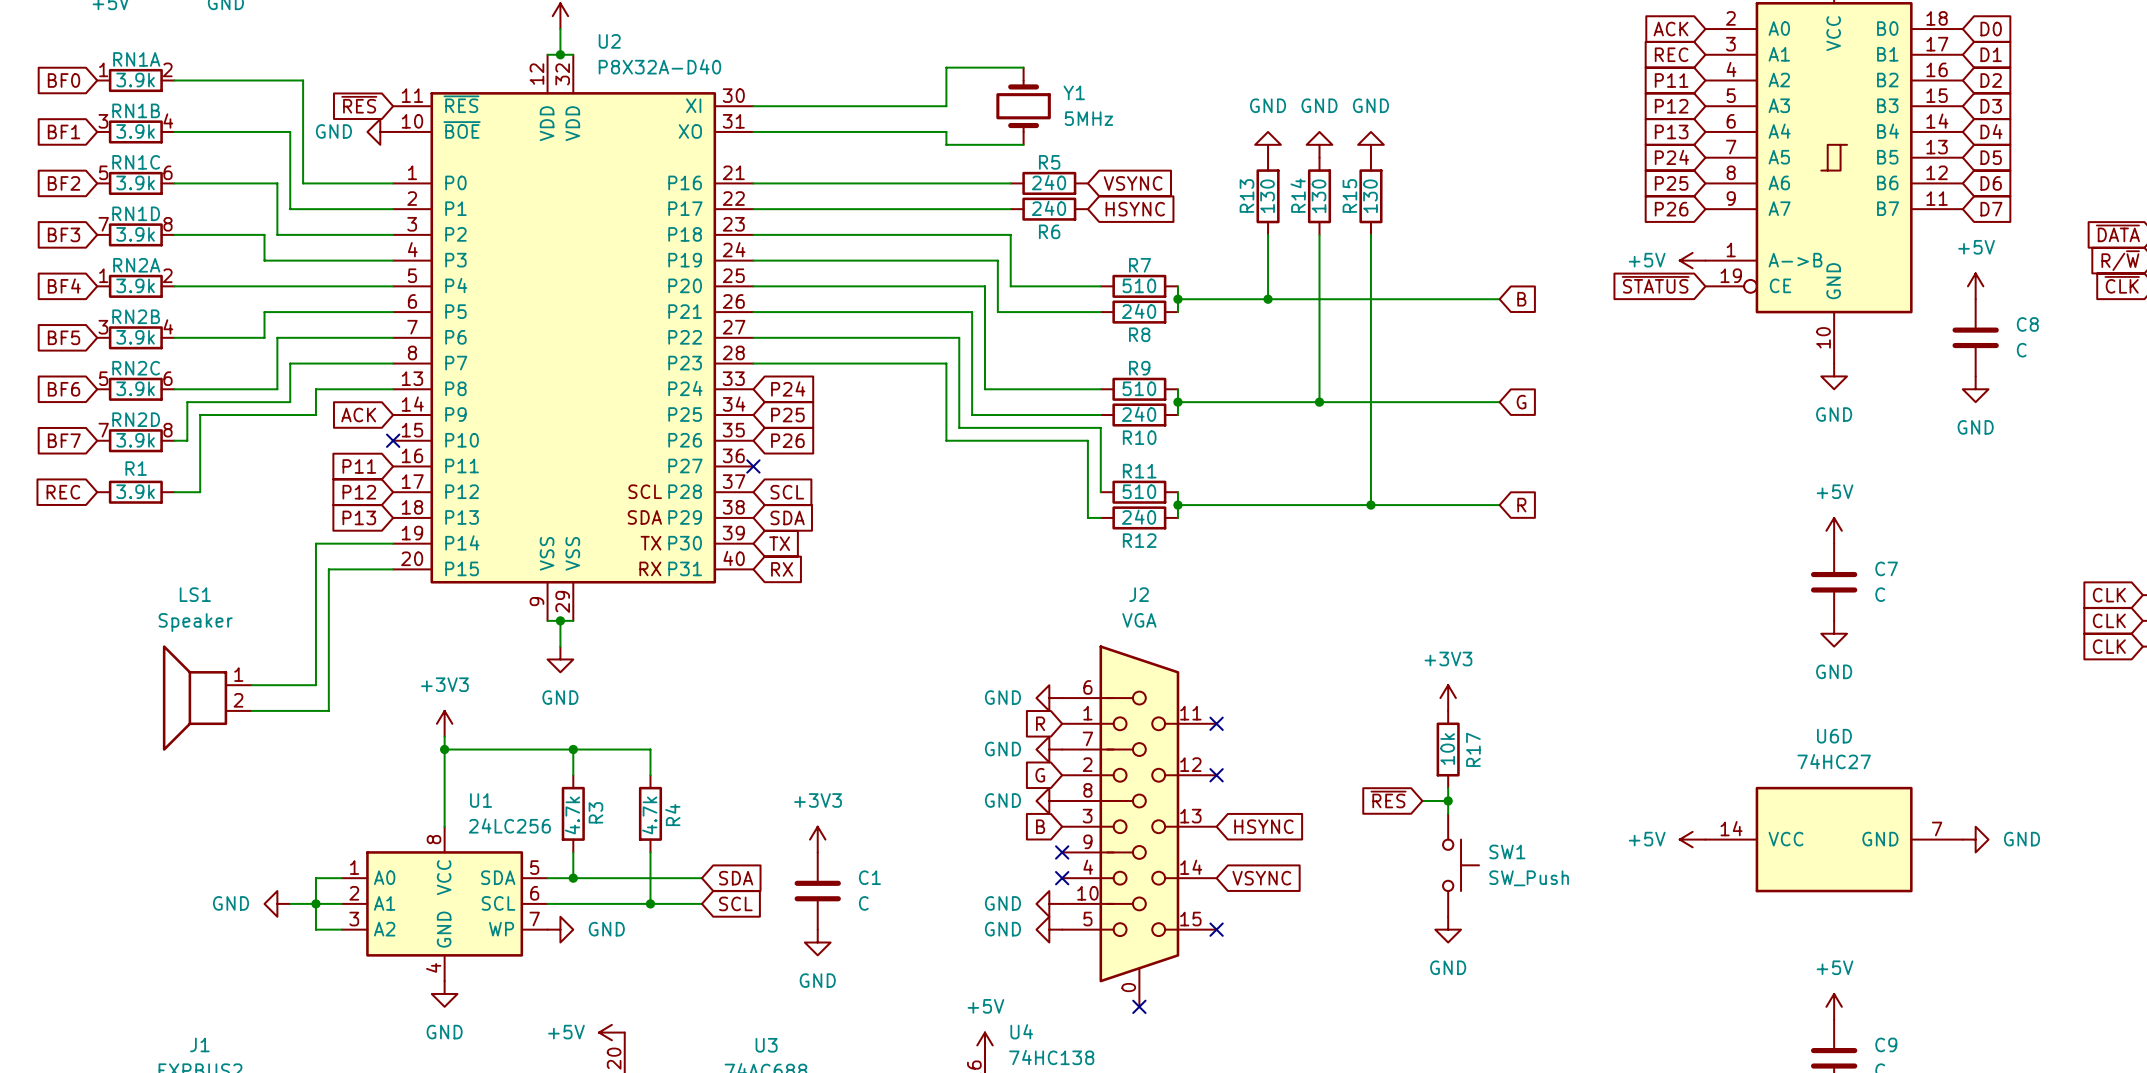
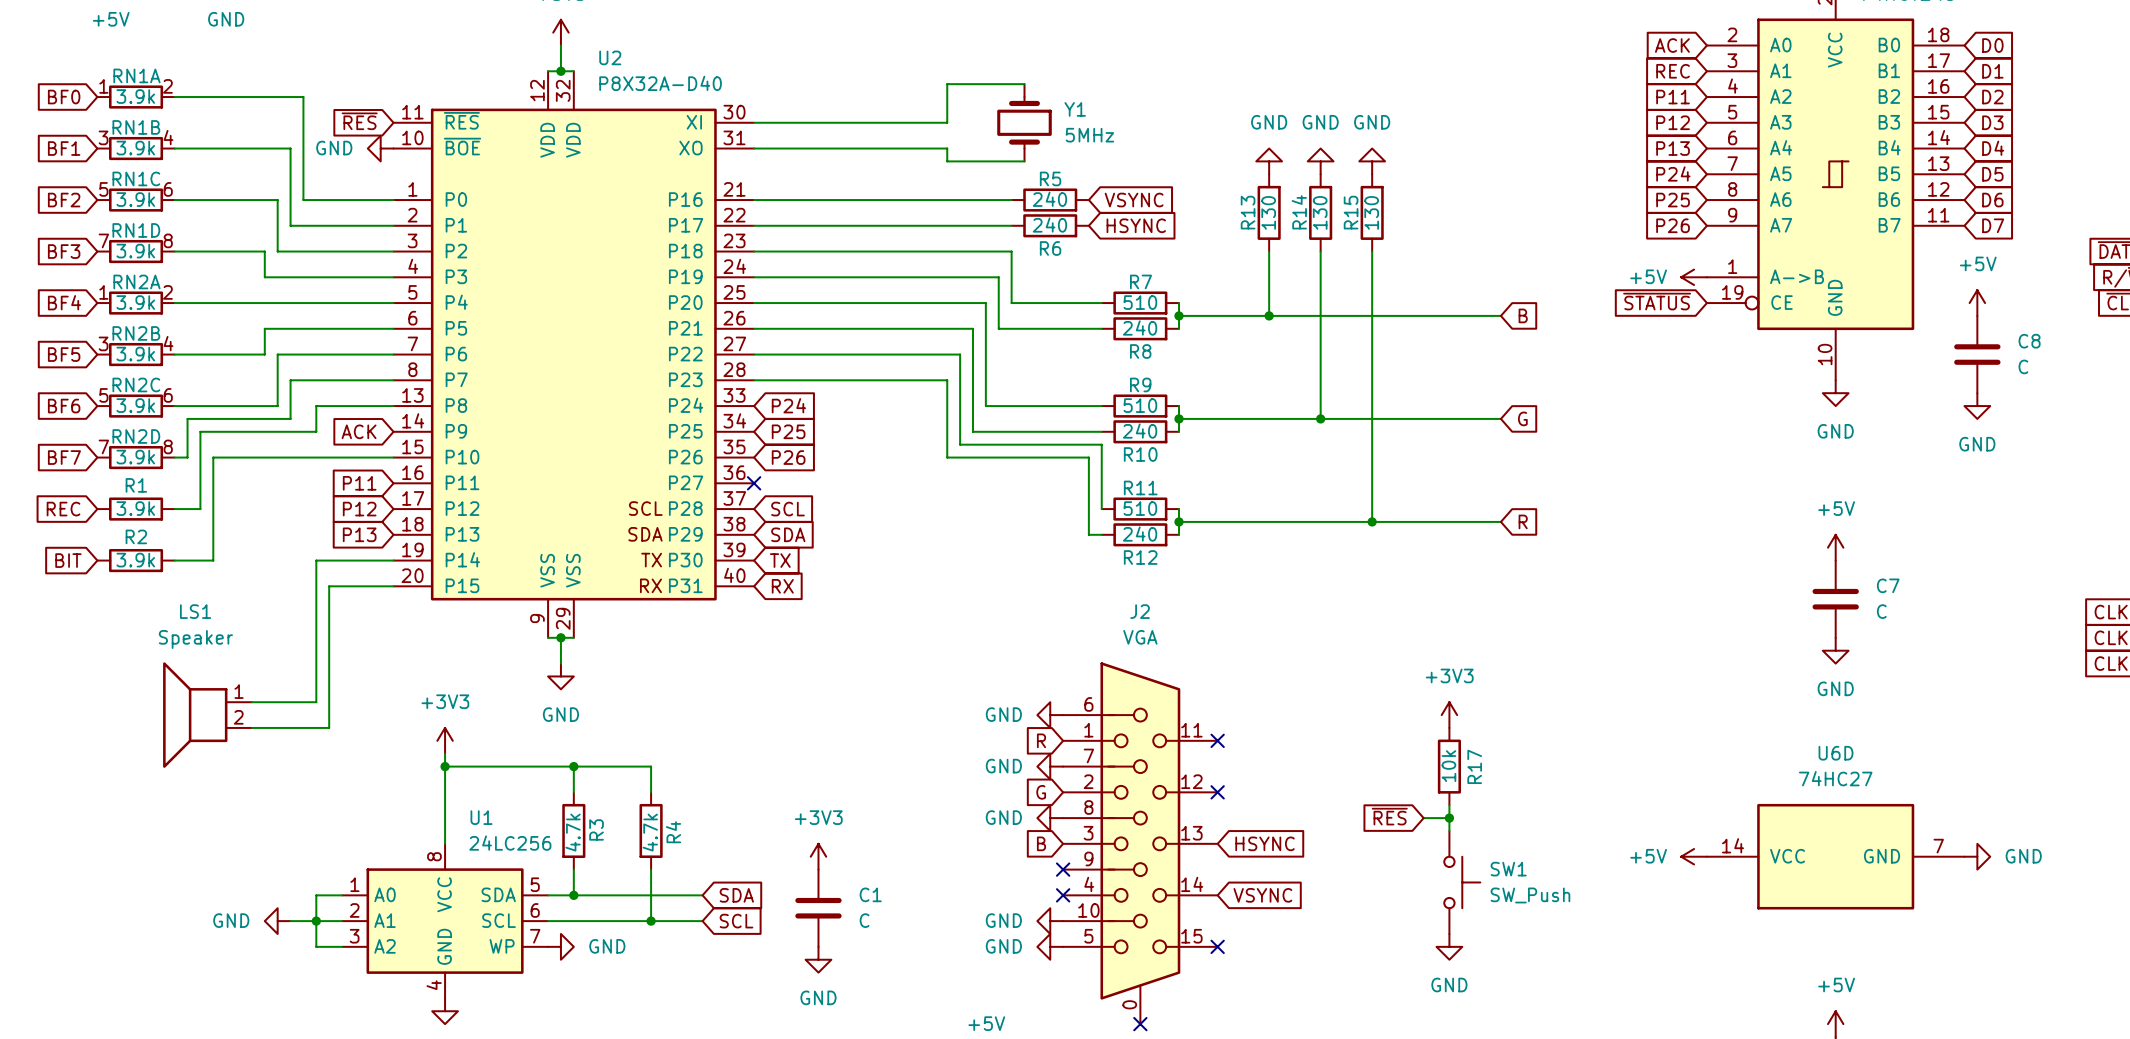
wire: none -> (393, 457) (213, 457) (213, 560) (174, 560)
no-connect mark: (393, 440) -> none
global label: none -> BIT (68, 560)
R2: none -> 3.9k (136, 560)

